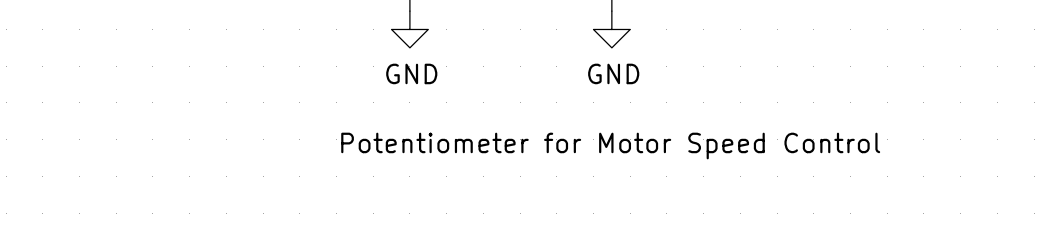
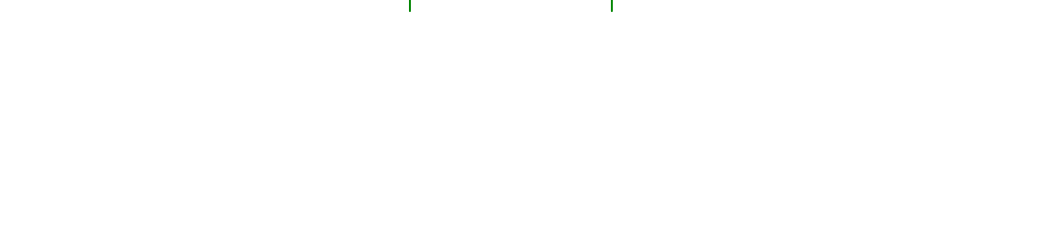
power symbol: GND (409, 29) -> none
power symbol: GND (611, 29) -> none
text: Potentiometer for Motor Speed Control (610, 146) -> none

